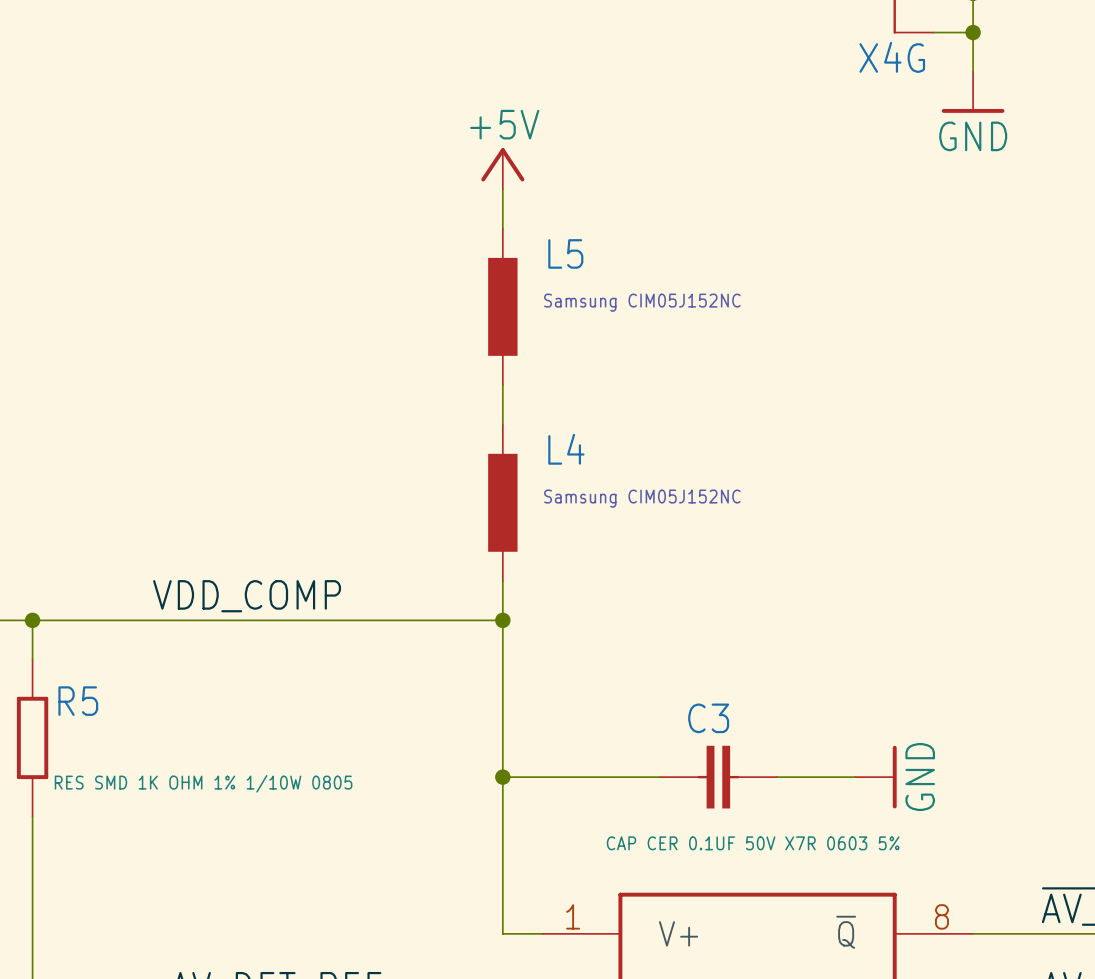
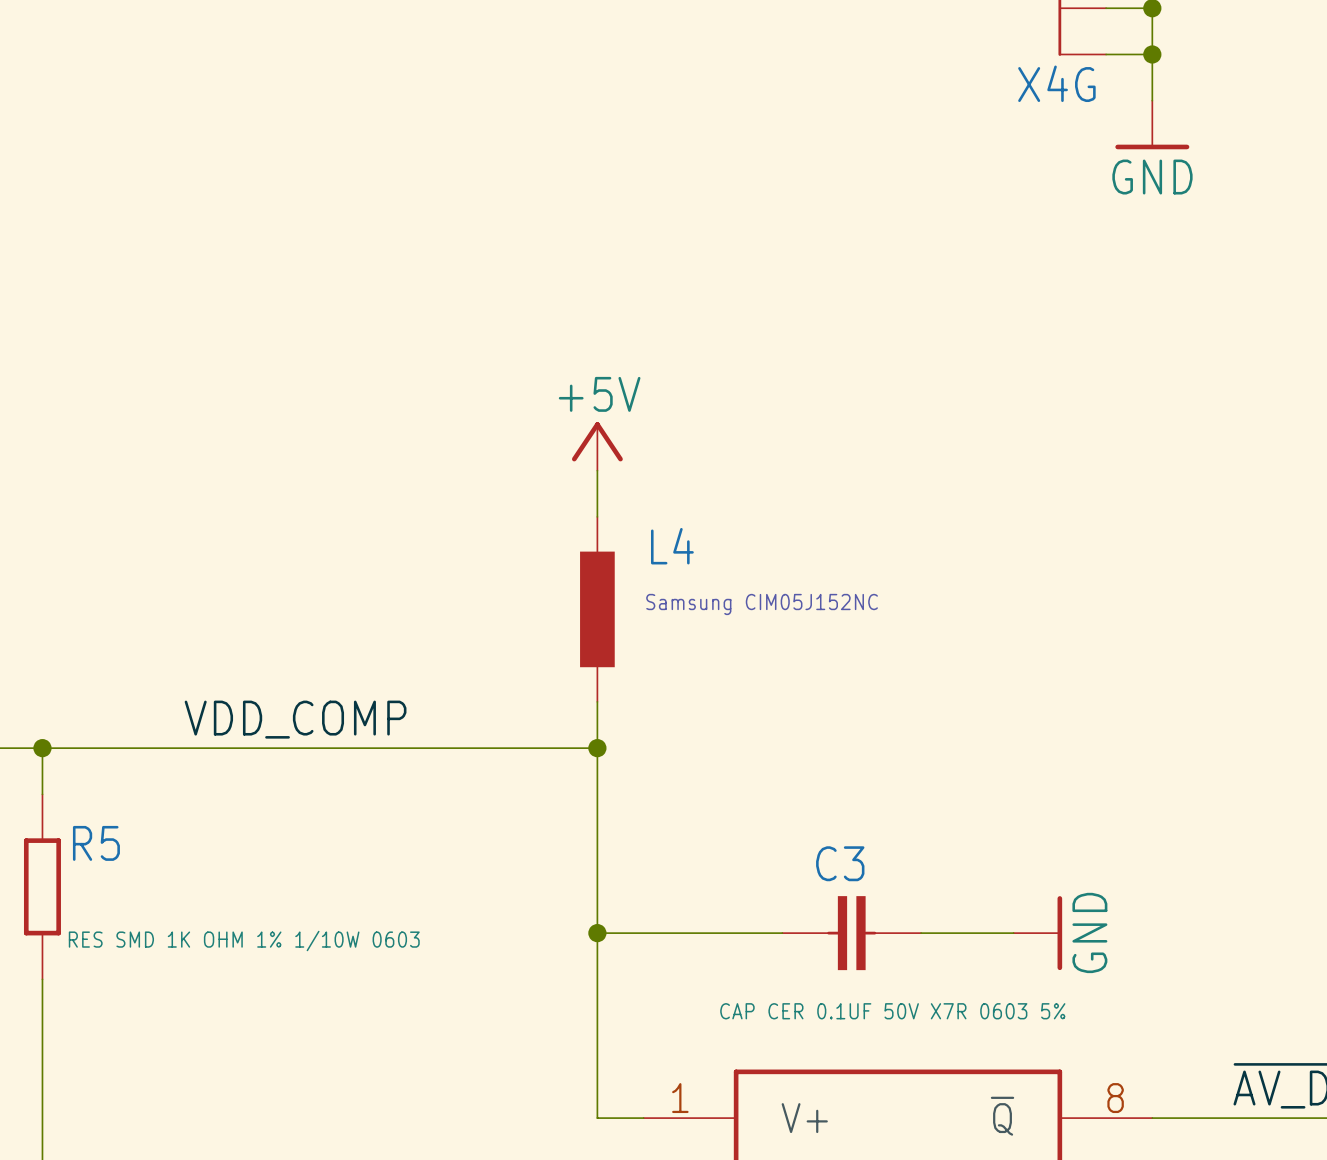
power symbol position: +5V (502, 168) -> +5V (597, 446)
wire: (502, 189) (502, 228) -> none
L5: Samsung CIM05J152NC (502, 306) -> none
R5 value: RES SMD 1K OHM 1% 1/10W 0805 (203, 783) -> RES SMD 1K OHM 1% 1/10W 0603 (244, 941)

